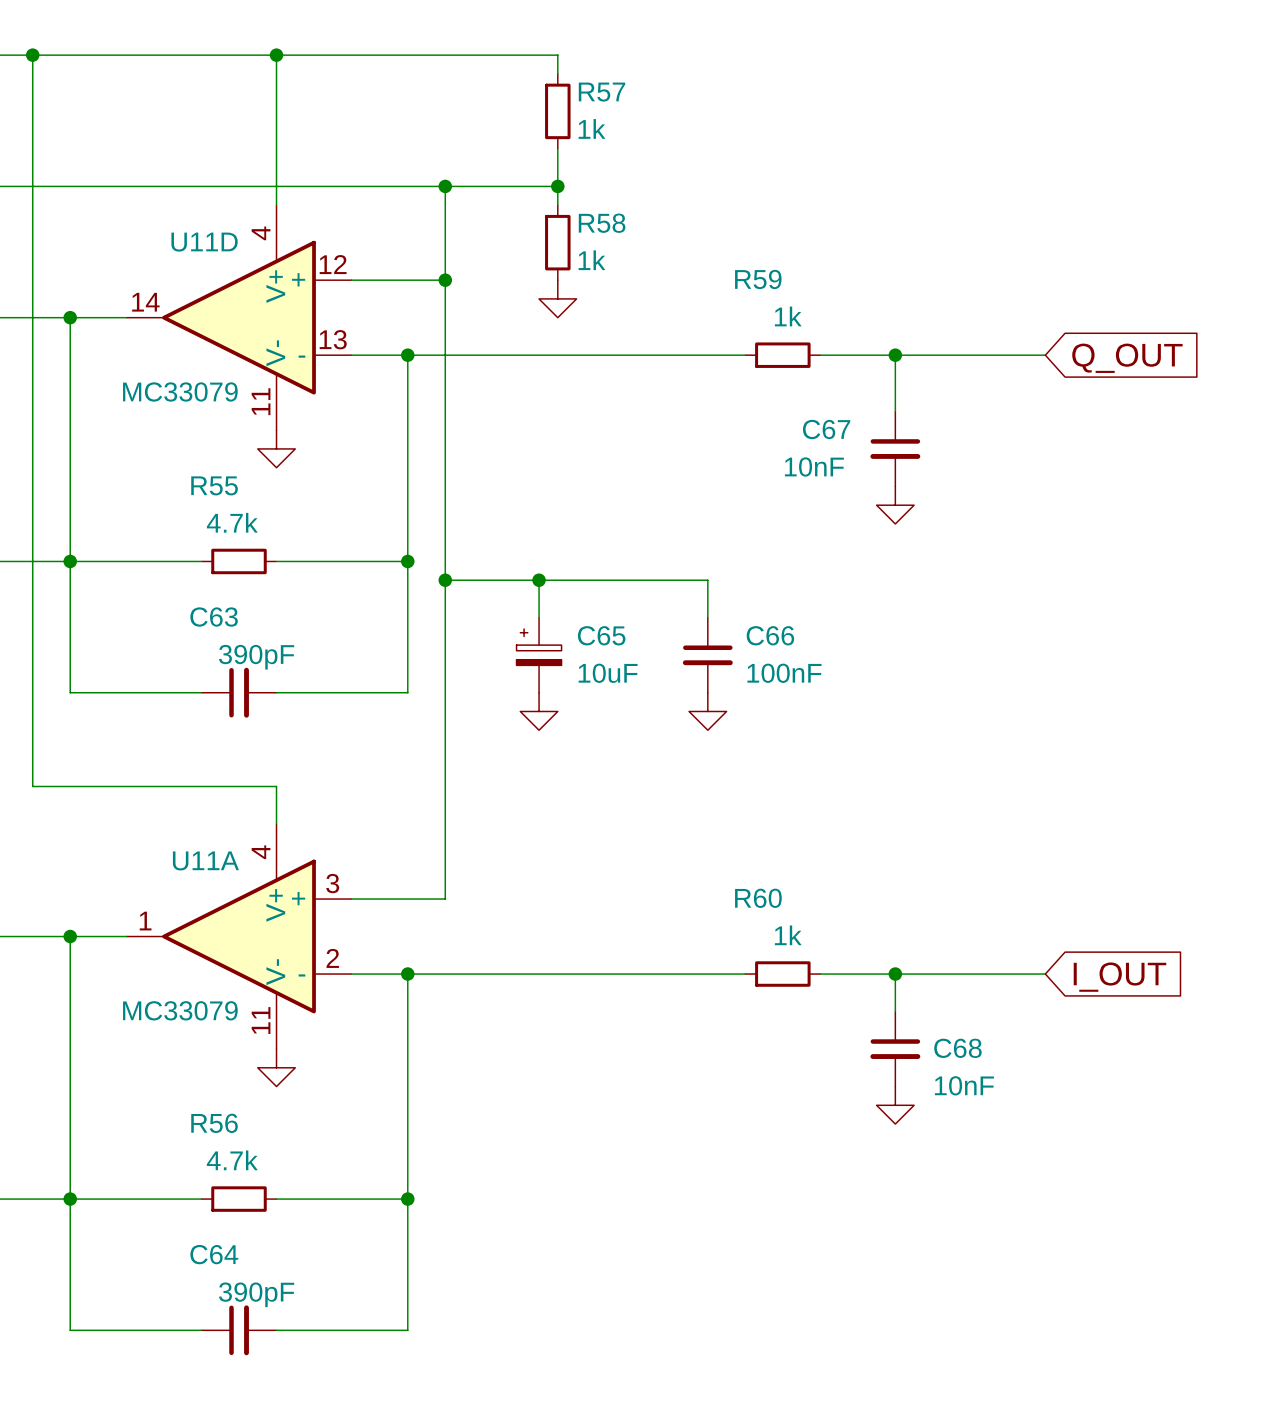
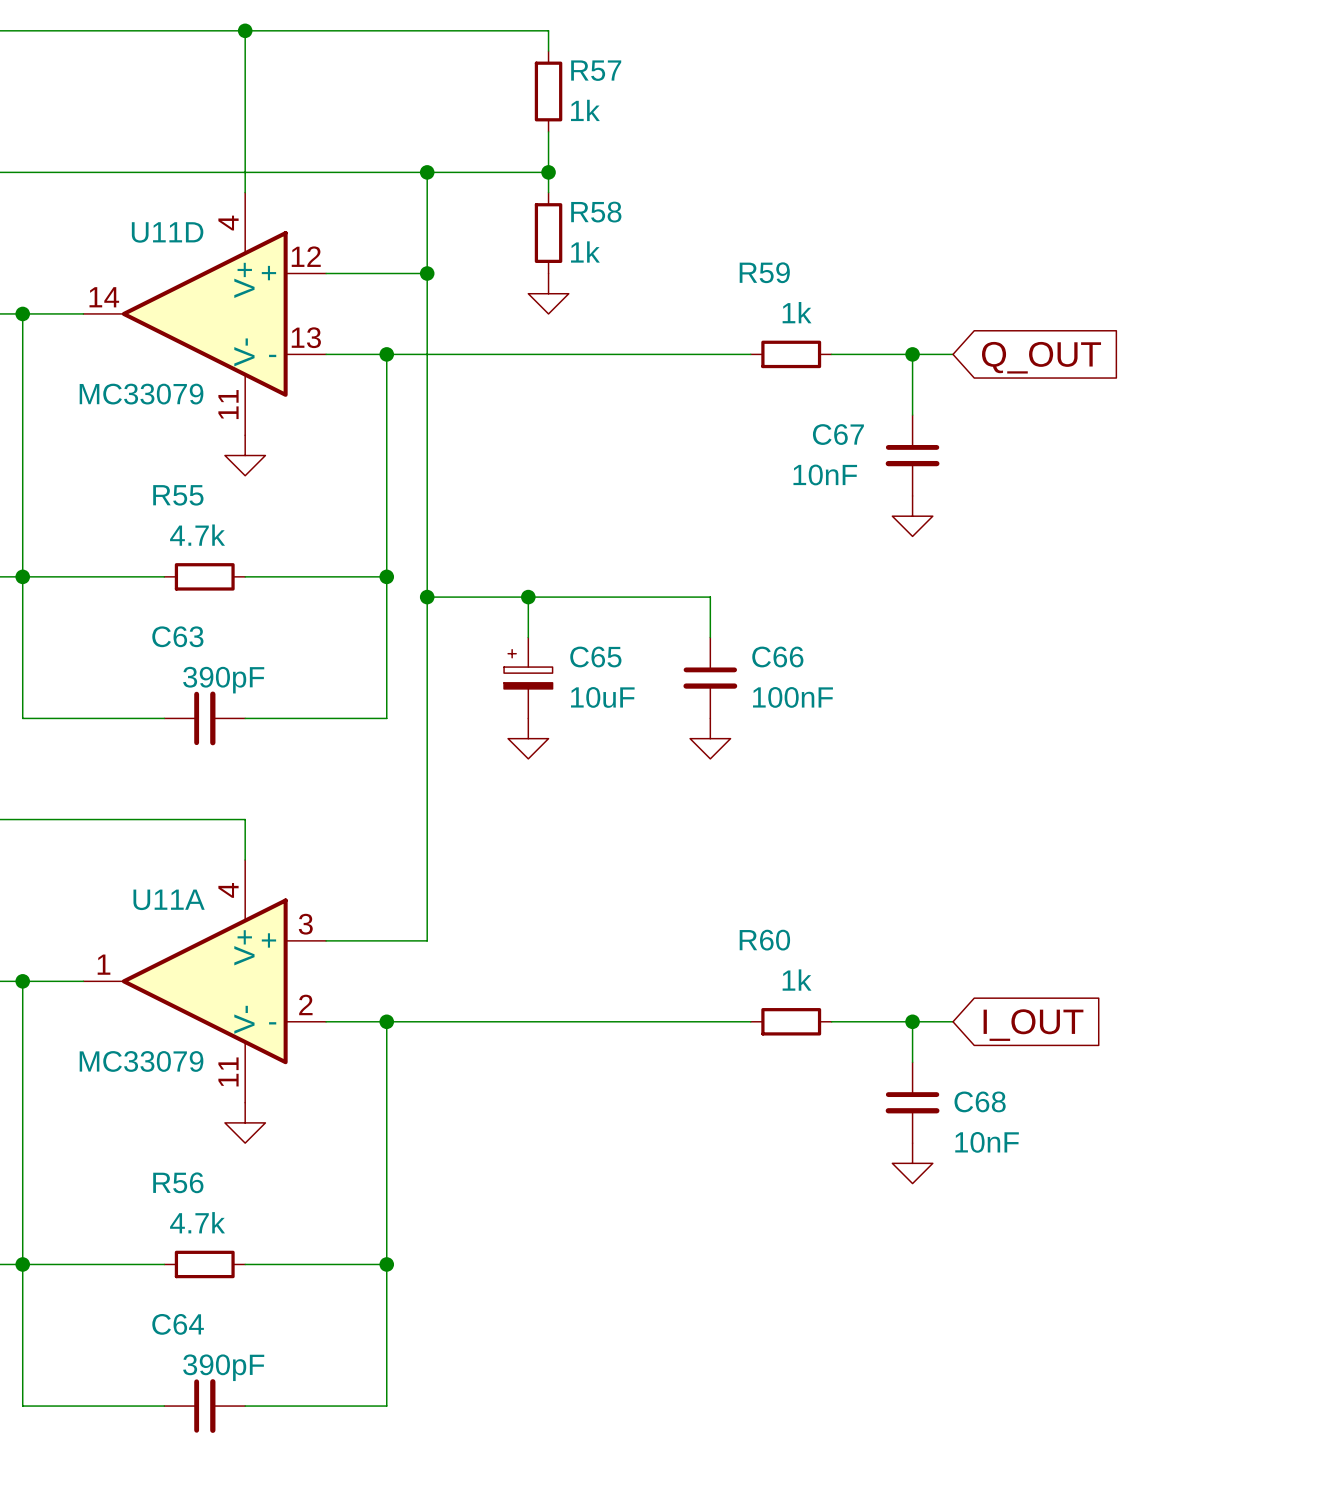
wire: (932, 355) (1045, 355) -> none
global label position: Q_OUT (1127, 358) -> Q_OUT (1041, 357)
wire: (932, 974) (1045, 974) -> none
global label position: I_OUT (1119, 977) -> I_OUT (1033, 1025)

